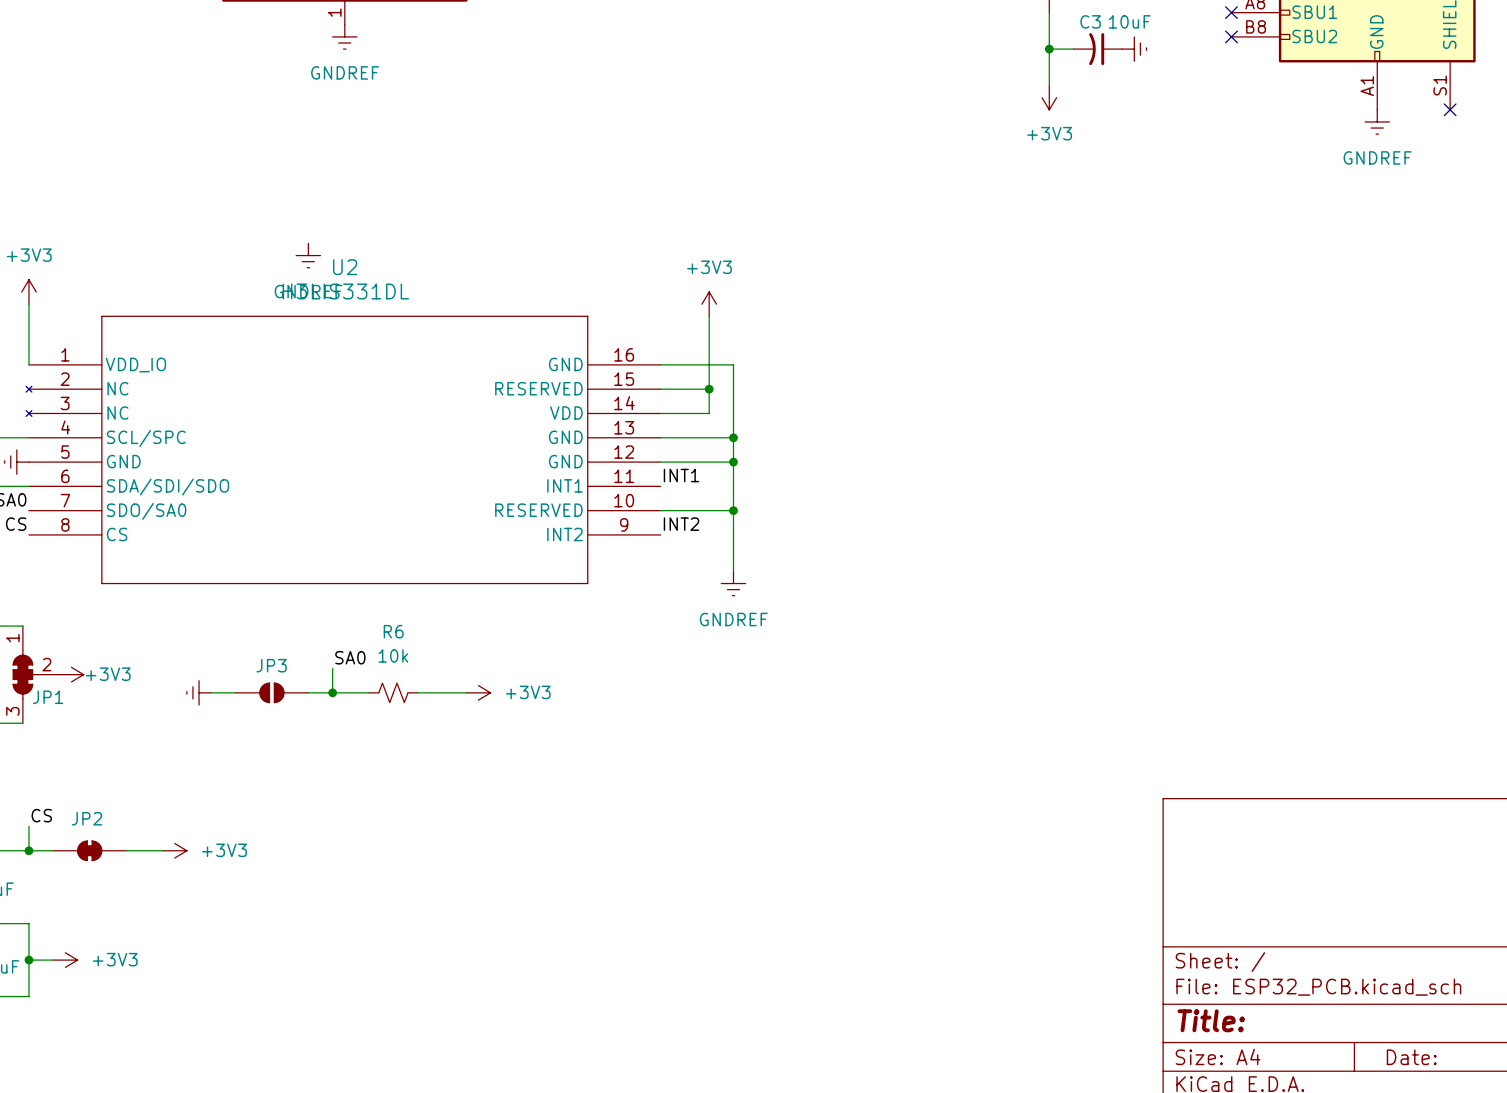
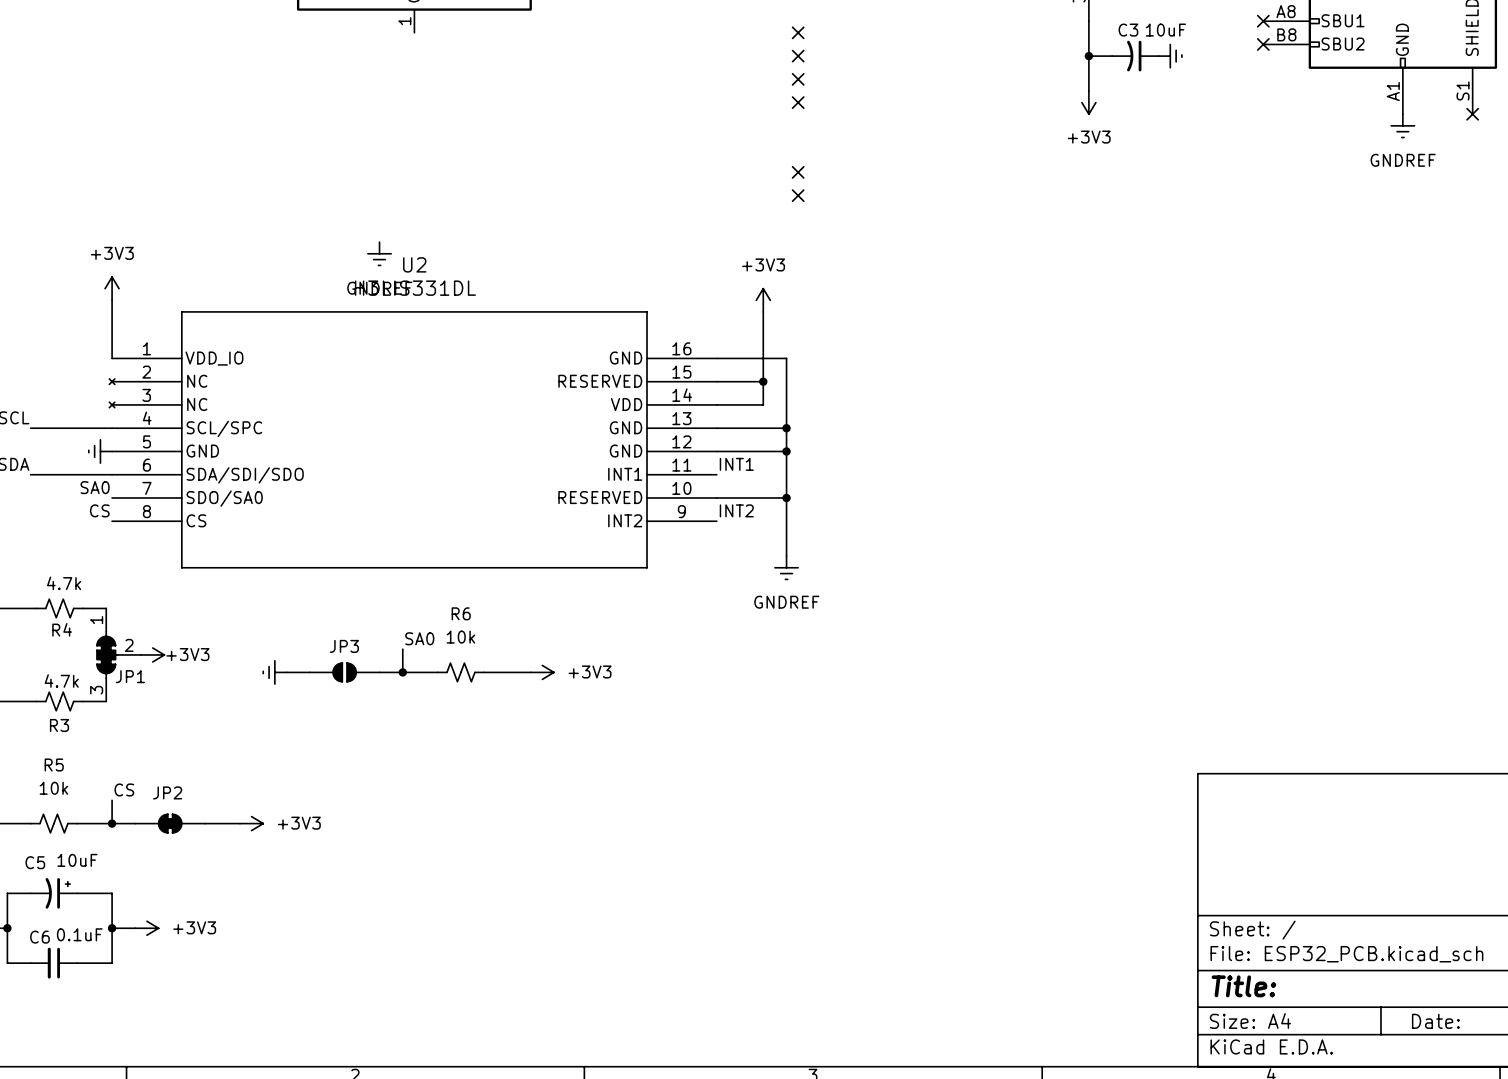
no-connect mark: none -> (798, 32)
power symbol: GNDREF (344, 36) -> none
no-connect mark: none -> (798, 56)
no-connect mark: none -> (798, 79)
no-connect mark: none -> (798, 102)
no-connect mark: none -> (798, 172)
no-connect mark: none -> (798, 195)

